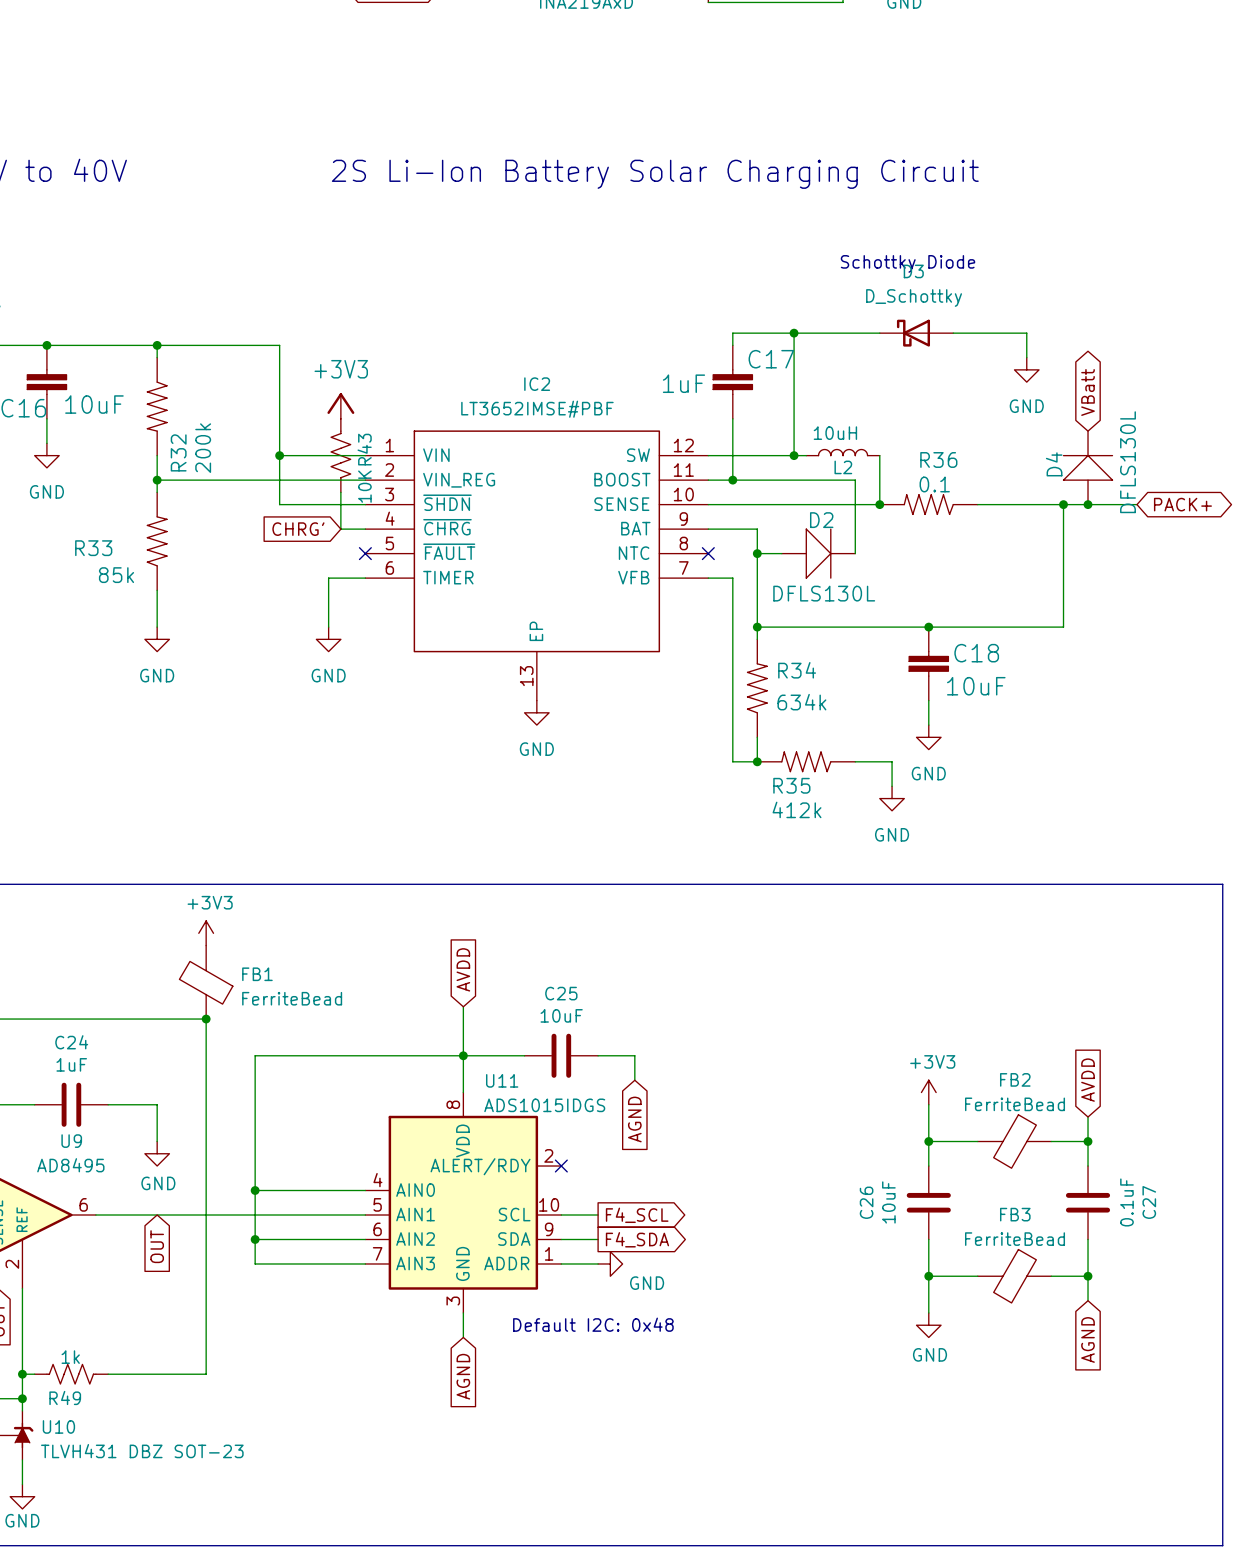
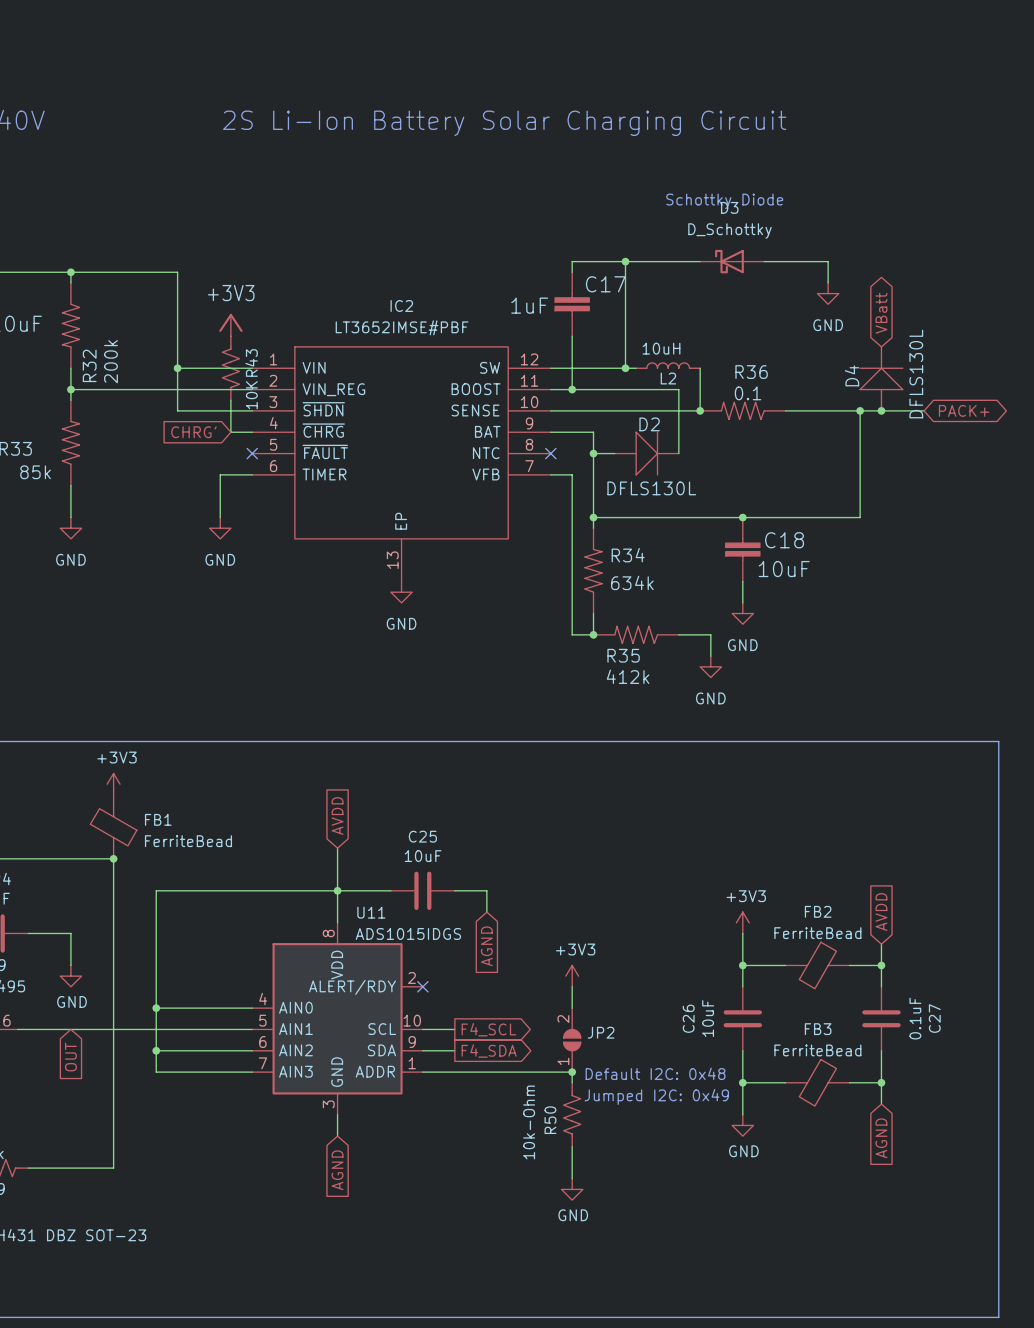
power symbol: none -> +3V3 (572, 976)
wire: none -> (572, 986) (572, 1008)
JP2: none -> (572, 1040)
wire: none -> (454, 1072) (572, 1072) (572, 1082)
power symbol rotation: 0° (610, 1263) -> 90° clockwise (572, 1189)
power symbol position: GND (610, 1263) -> GND (572, 1189)
junction: none -> (572, 1072)
text: none -> Default I2C: 0x48 (655, 1073)
power symbol text position: GND (647, 1283) -> GND (573, 1215)
text: none -> Jumped I2C: 0x49 (656, 1096)
R50: none -> 10k-Ohm (572, 1114)
text: Default I2C: 0x48 (593, 1324) -> none
wire: none -> (572, 1146) (572, 1178)

